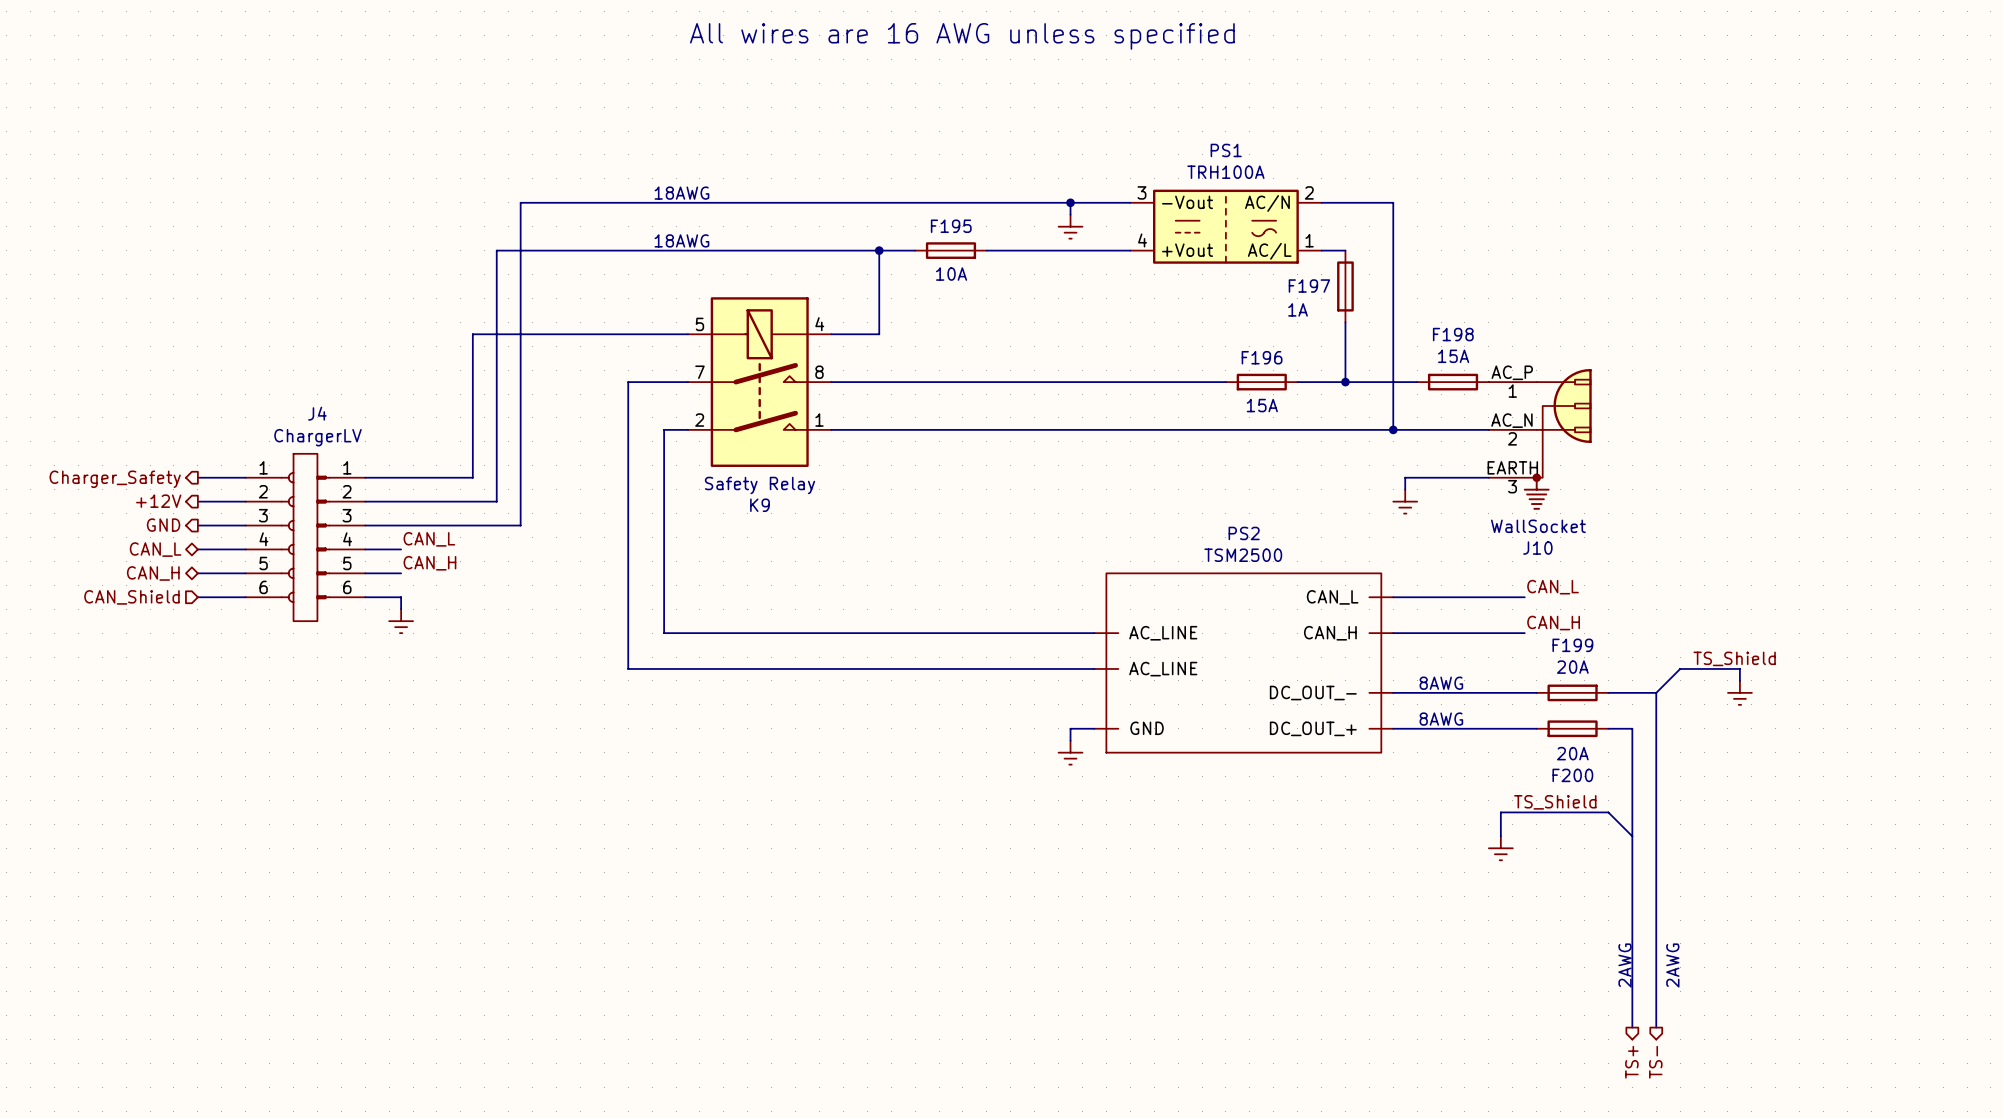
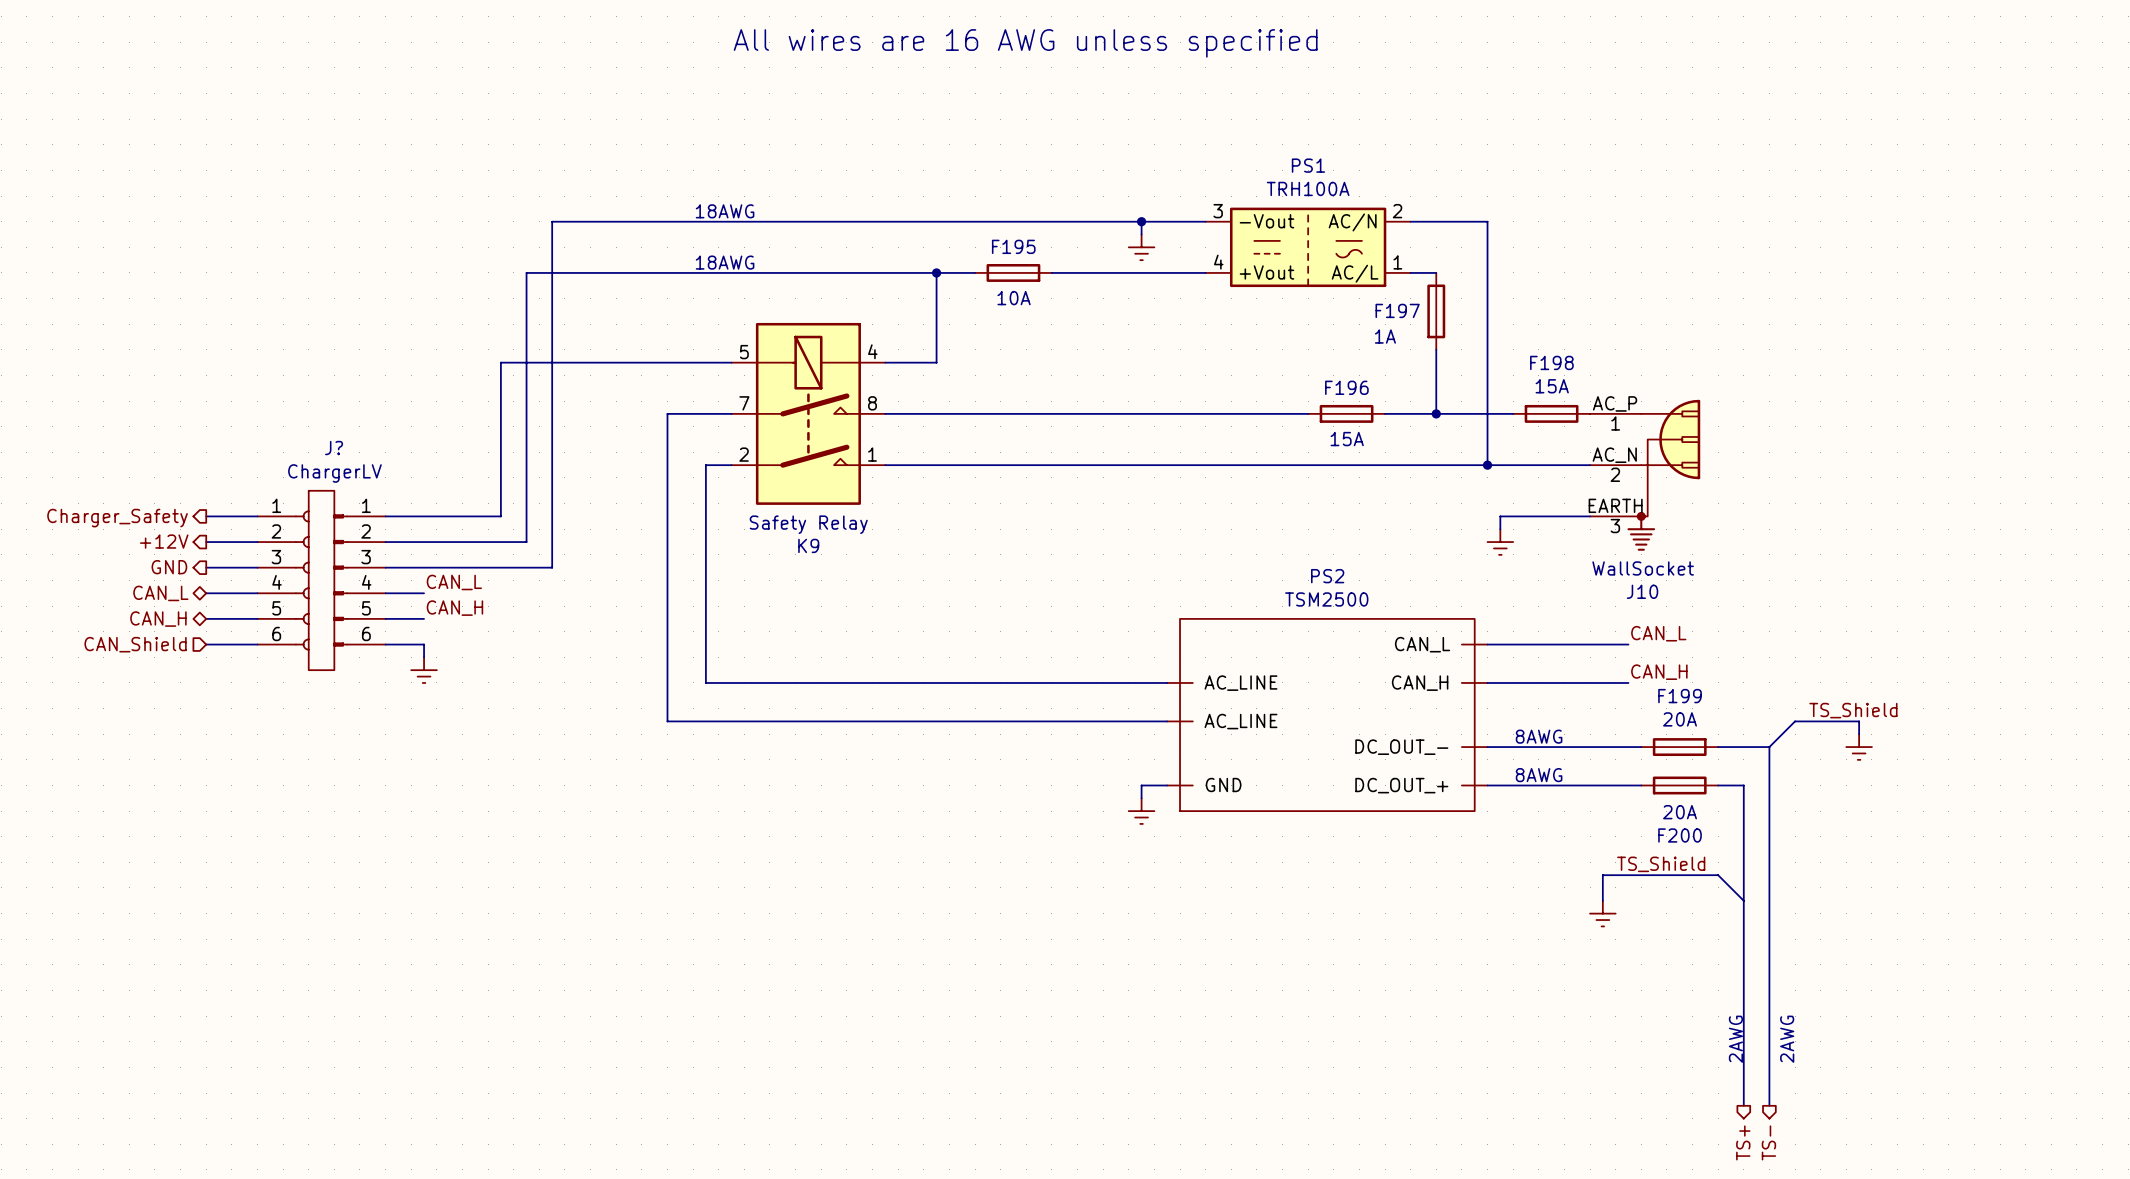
J4 name: J4 (317, 413) -> J? (334, 448)

